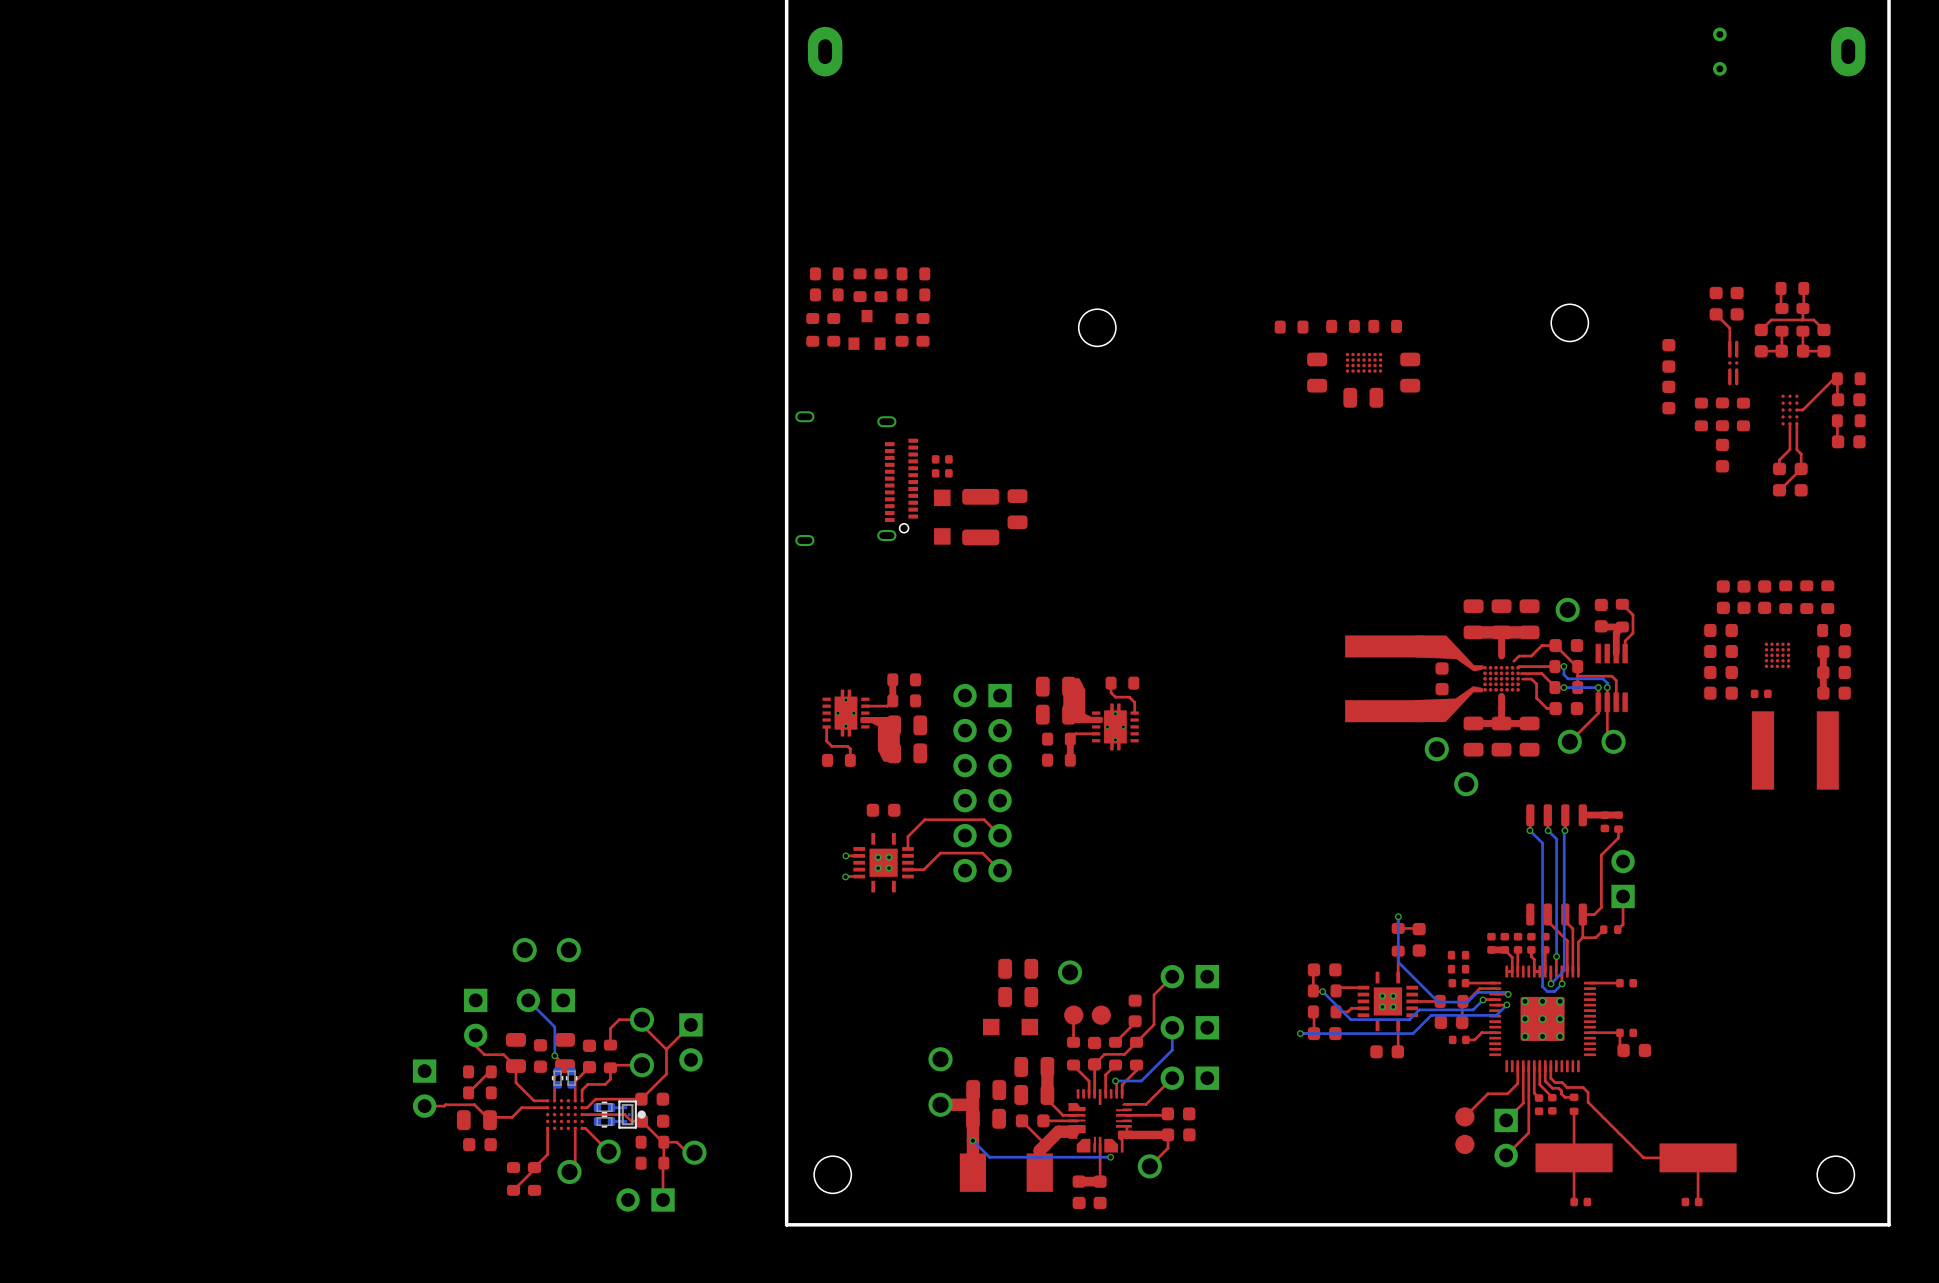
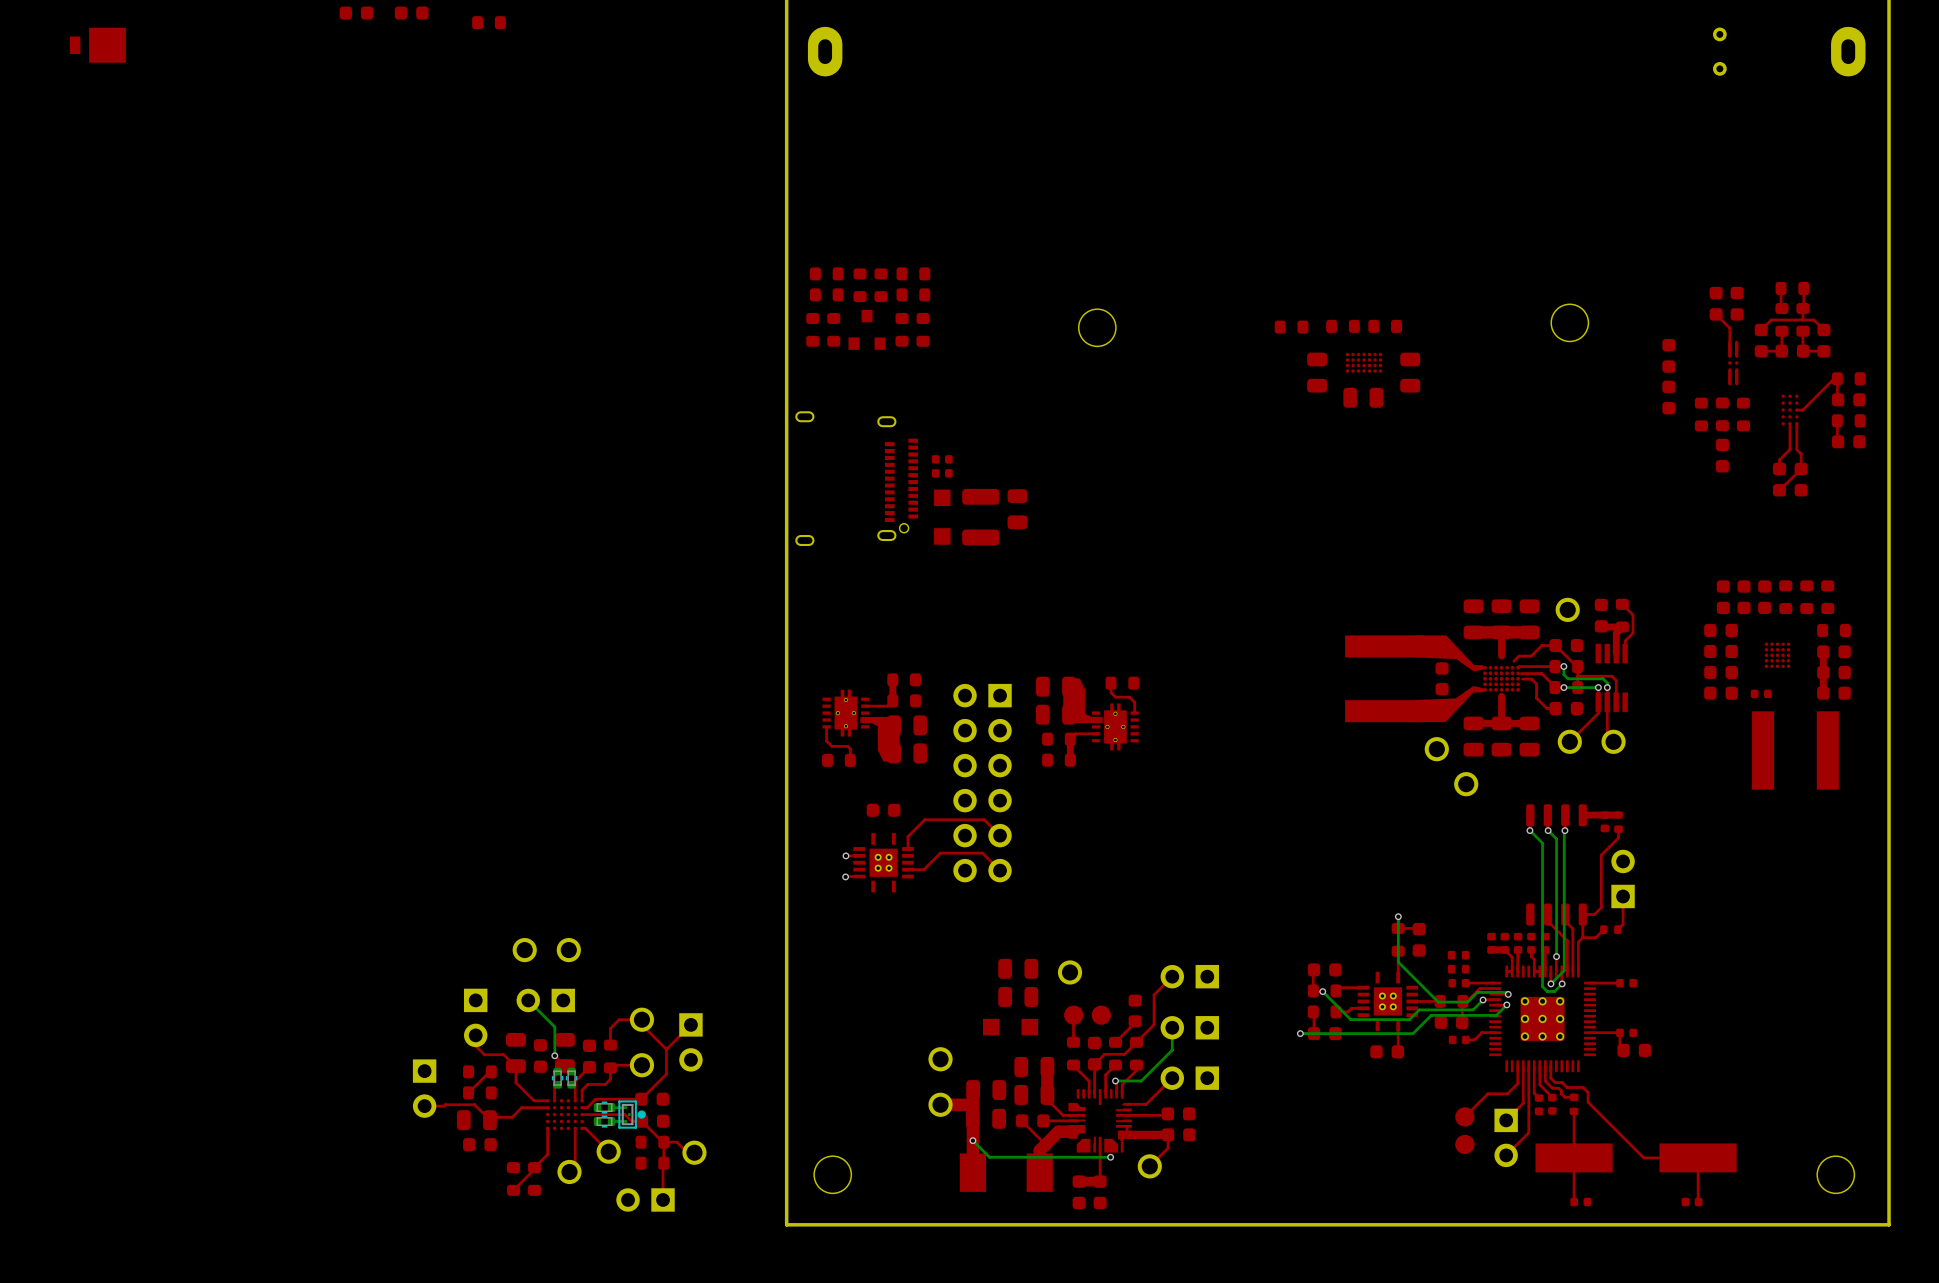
part: none -> (356, 13)
part: none -> (411, 13)
part: none -> (489, 22)
part: none -> (97, 45)

